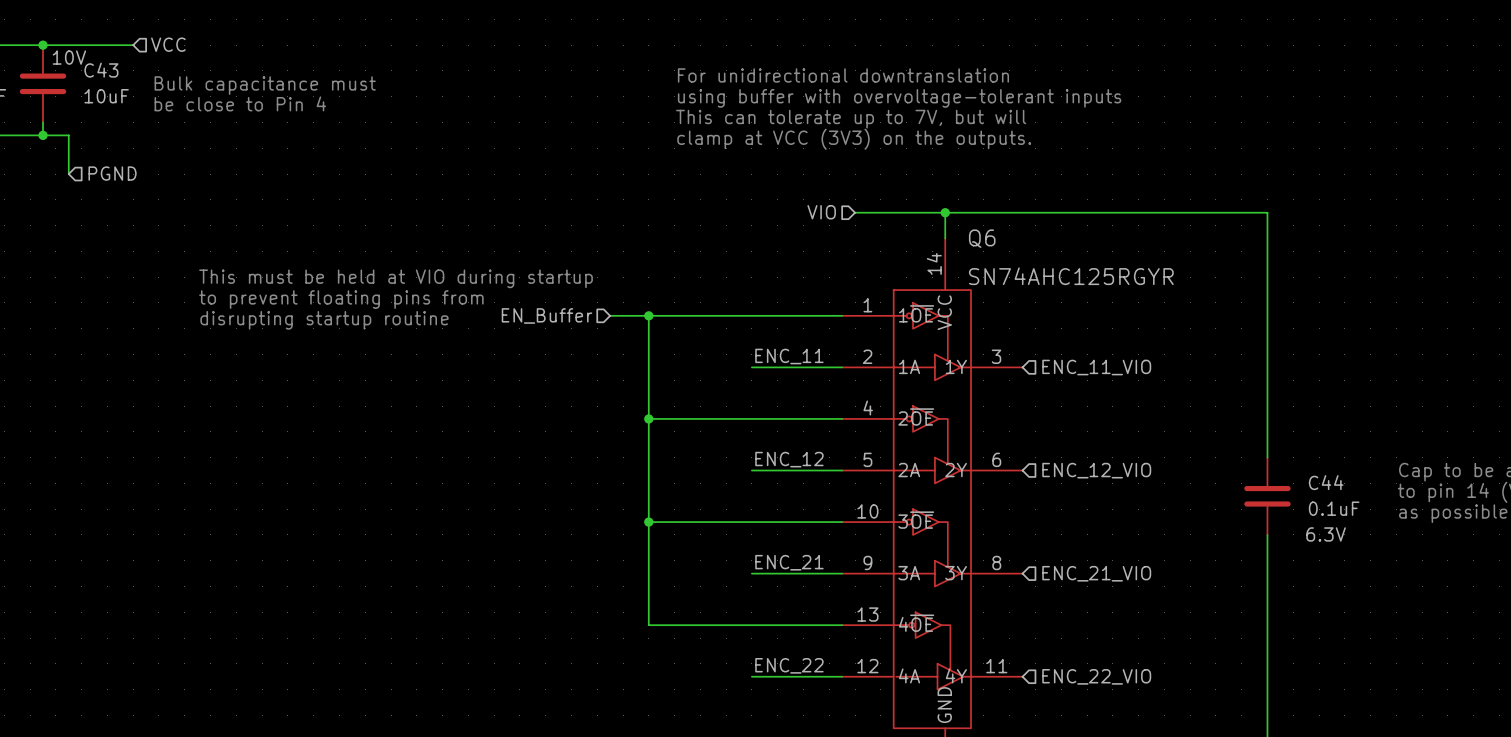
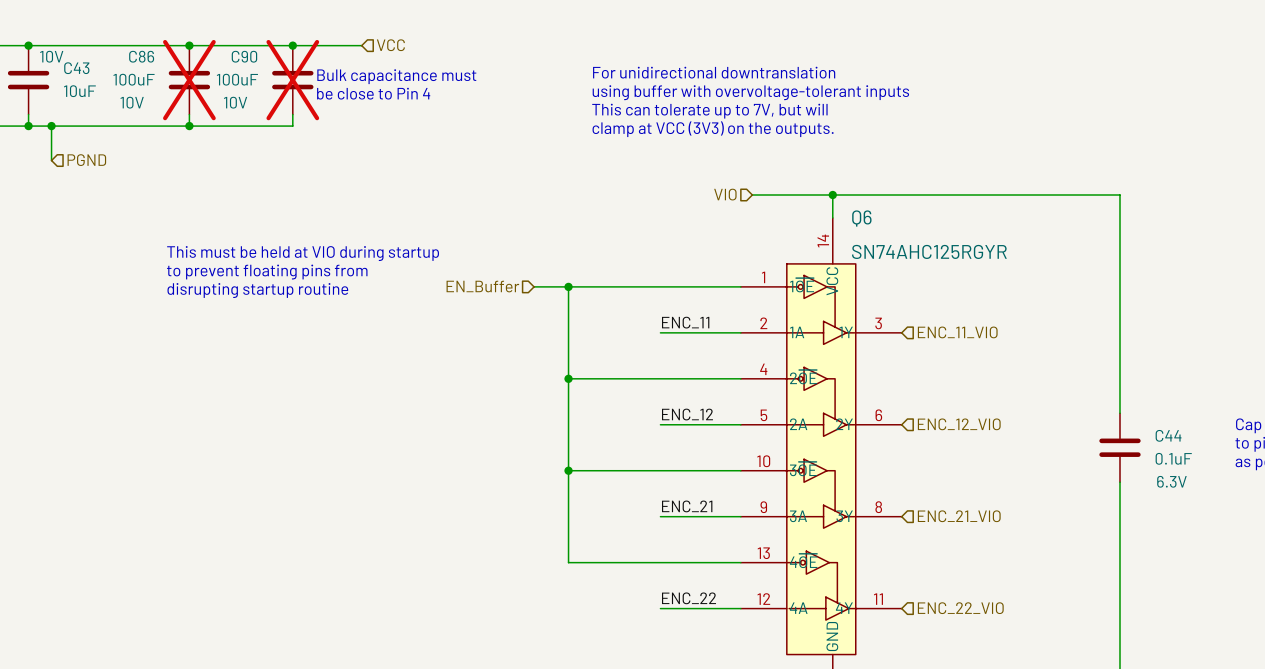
hierarchical label: VCC (168, 44) -> none
hierarchical label: none -> VCC (390, 45)
wire: none -> (108, 45) (361, 45)
junction: none -> (189, 45)
junction: none -> (292, 45)
C86: none -> 100uF (189, 80)
C90: none -> 100uF (292, 80)
text position: Bulk capacitance must (265, 85) -> Bulk capacitance must (396, 76)
text position: be close to Pin 4 (240, 103) -> be close to Pin 4 (373, 93)
wire: none -> (189, 114) (189, 126)
wire: none -> (292, 114) (292, 126) (51, 126)
junction: none -> (51, 126)
junction: none -> (189, 126)

